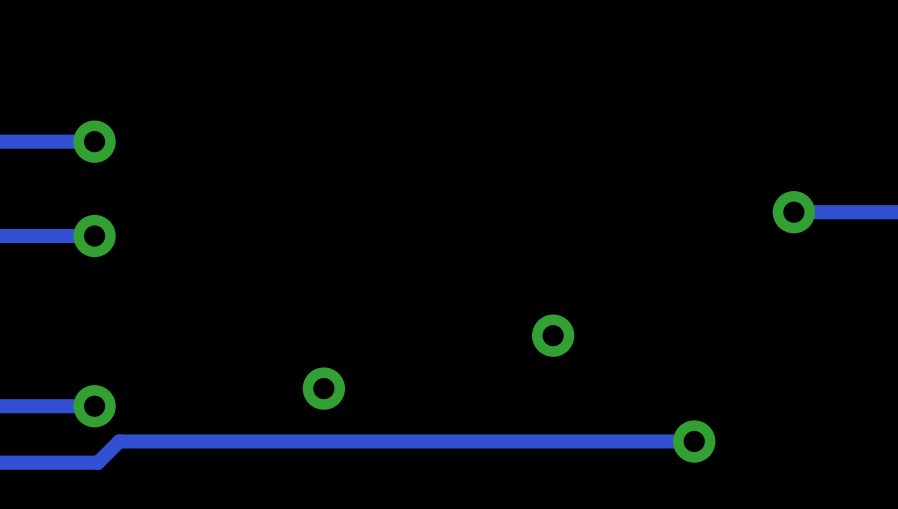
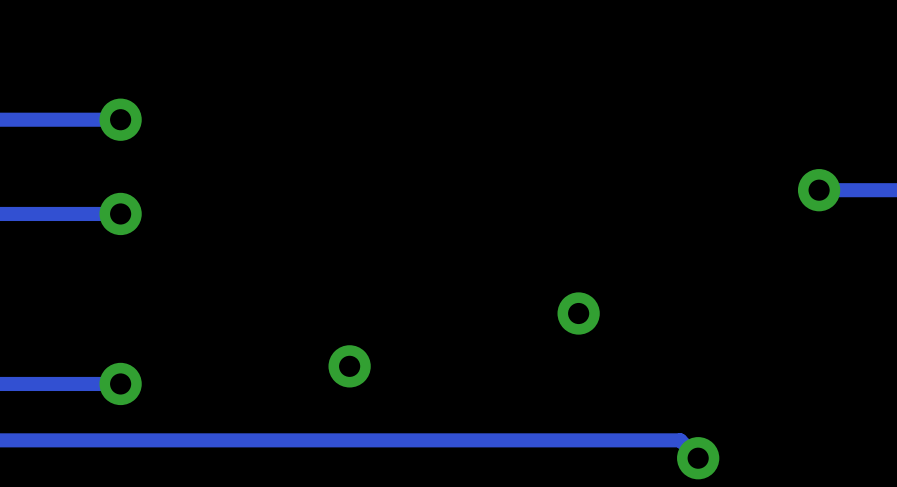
track: (694, 441) (119, 441) (98, 462) -> (698, 458) (680, 440) (124, 440)
via position: (694, 441) -> (698, 458)

